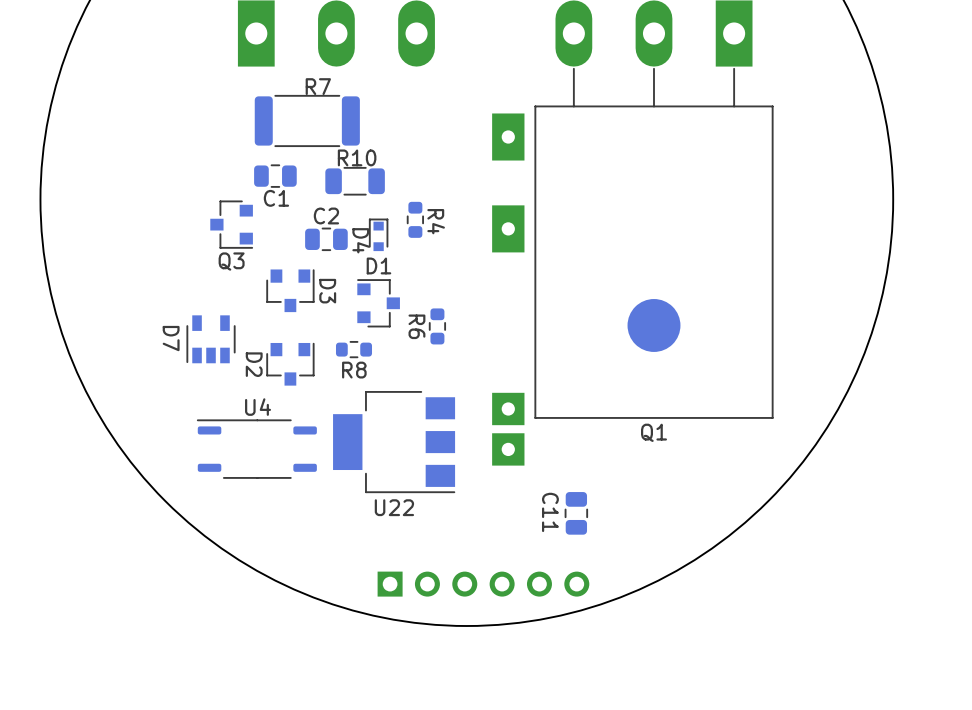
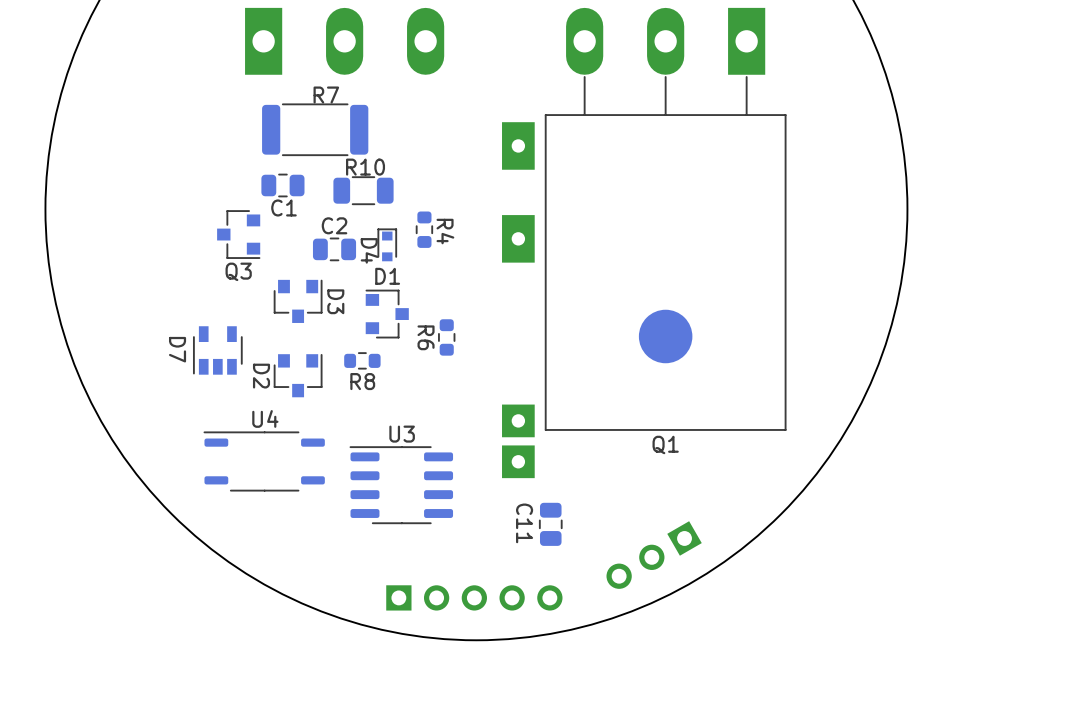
U22: (394, 442) -> none
U3: none -> (401, 485)
C11 position: (576, 513) -> (550, 524)
part: none -> (654, 555)
part: (483, 584) -> none

